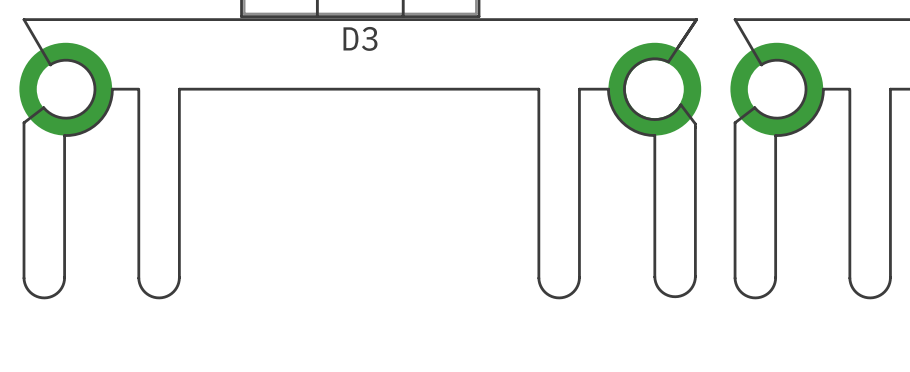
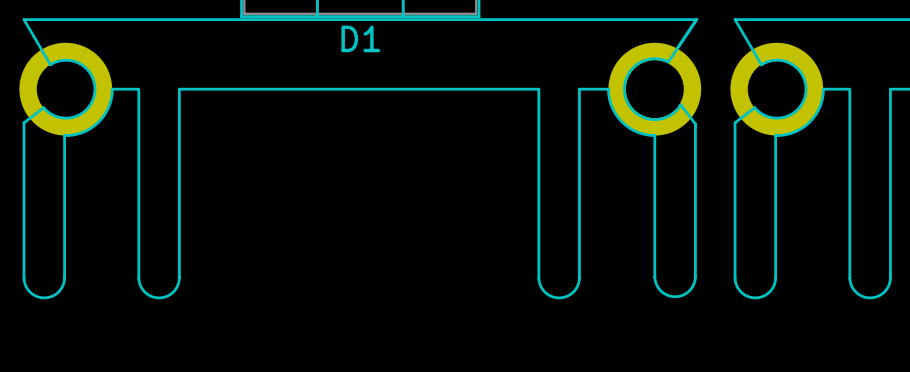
D3 name: D3 (360, 38) -> D1 (360, 38)

